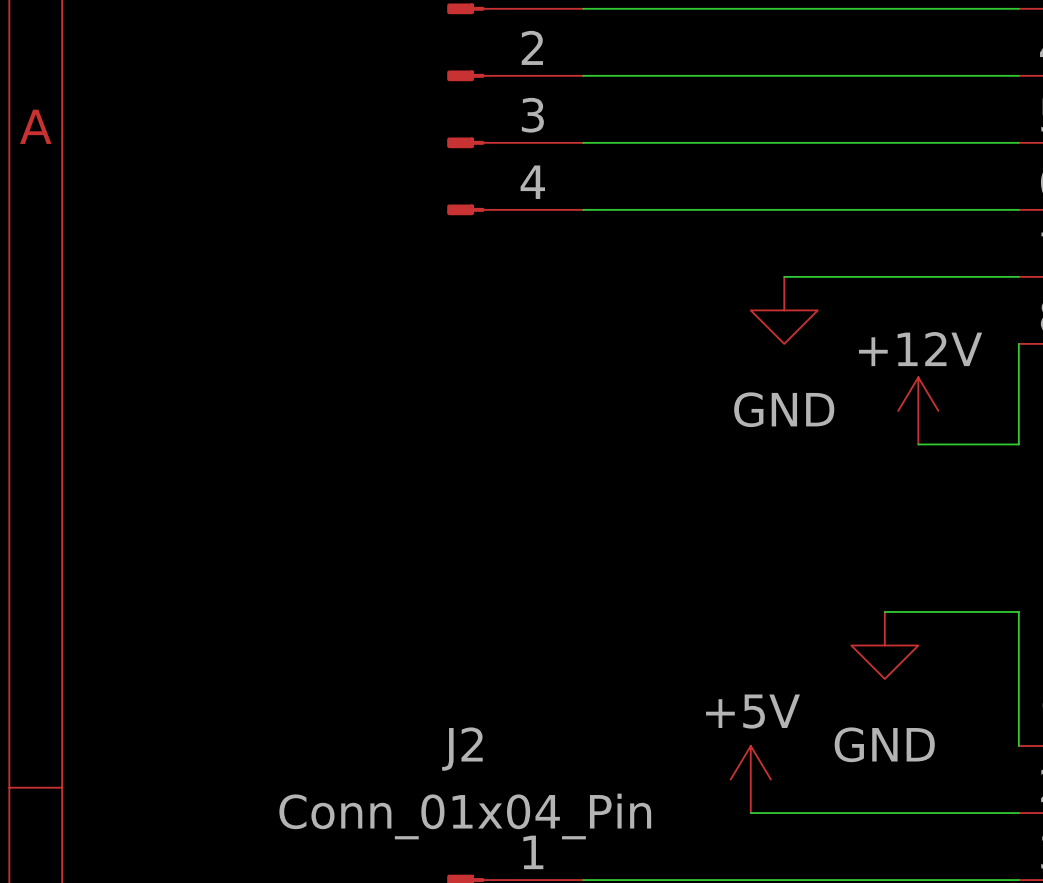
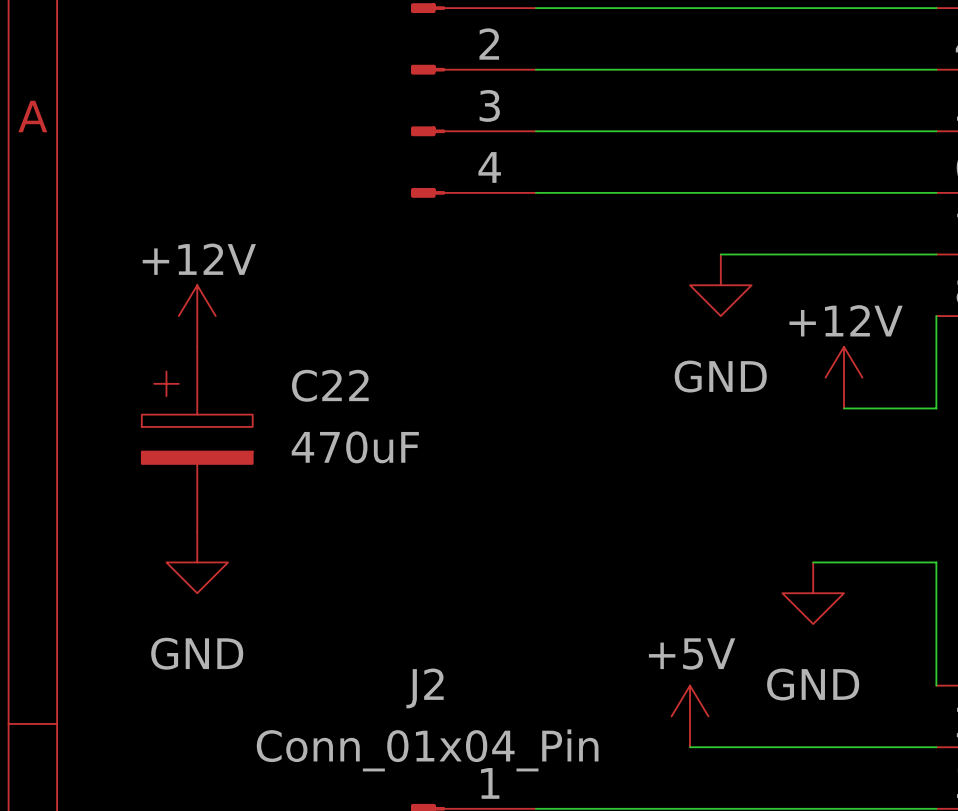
power symbol: none -> +12V (197, 316)
C22: none -> 470uF (197, 439)
power symbol: none -> GND (197, 562)

